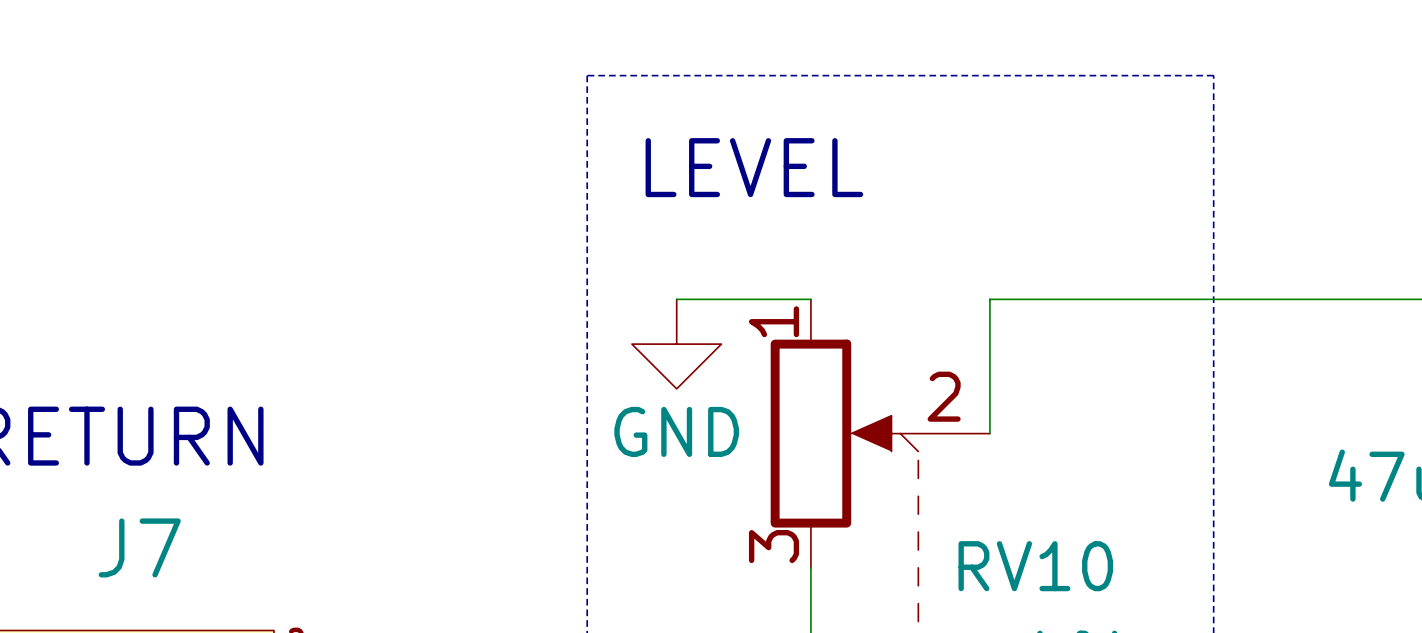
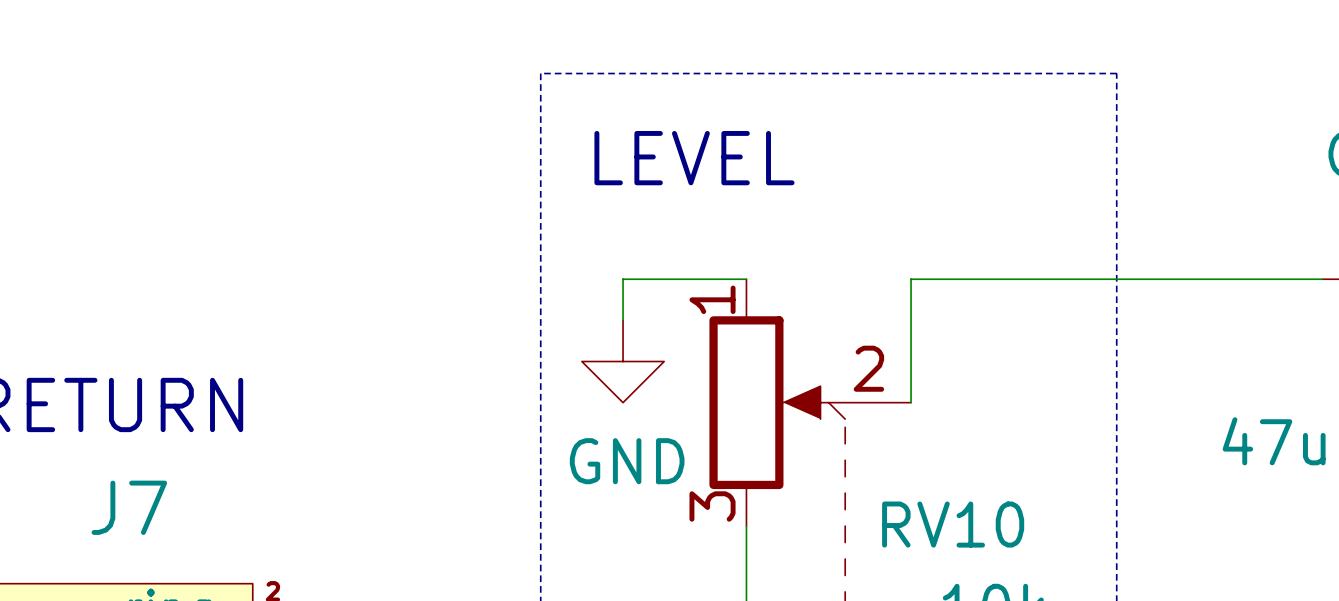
power symbol position: GND (676, 344) -> GND (623, 361)
power symbol text position: GND (676, 431) -> GND (627, 461)

